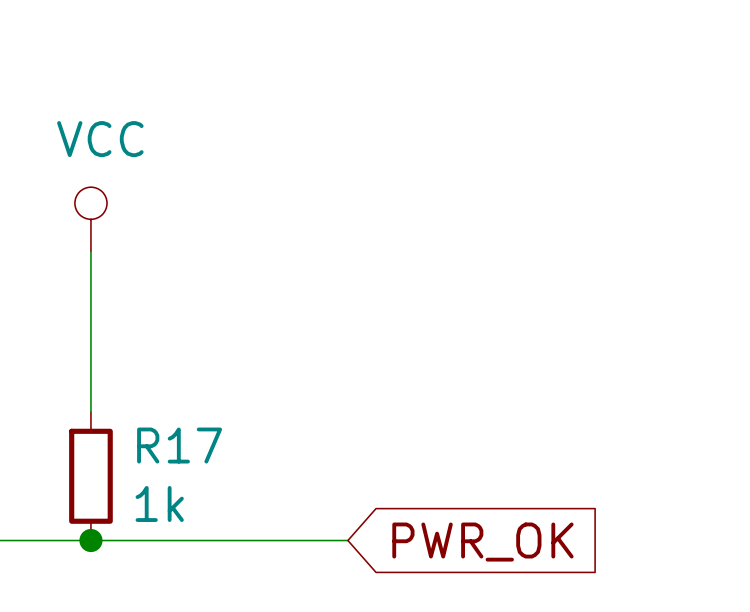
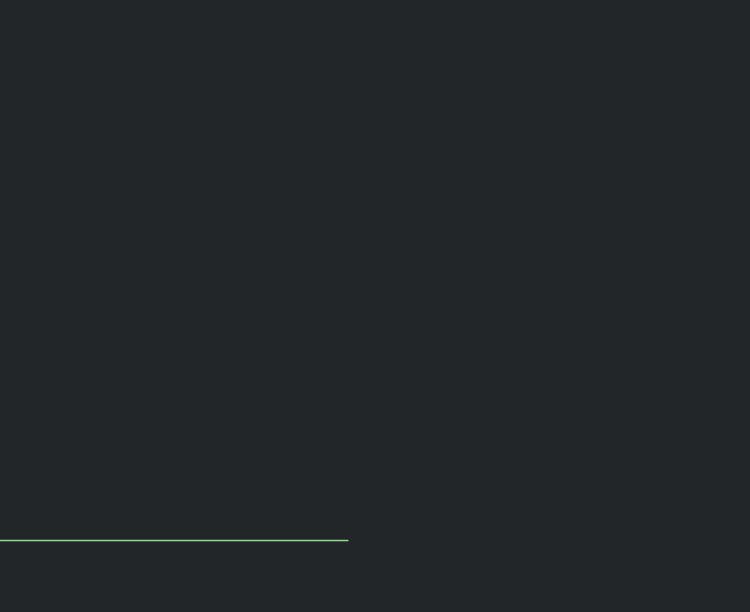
power symbol: VCC (90, 219) -> none
wire: (90, 251) (90, 412) -> none
R17: 1k (90, 476) -> none
junction: (90, 540) -> none
global label: PWR_OK (482, 542) -> none

